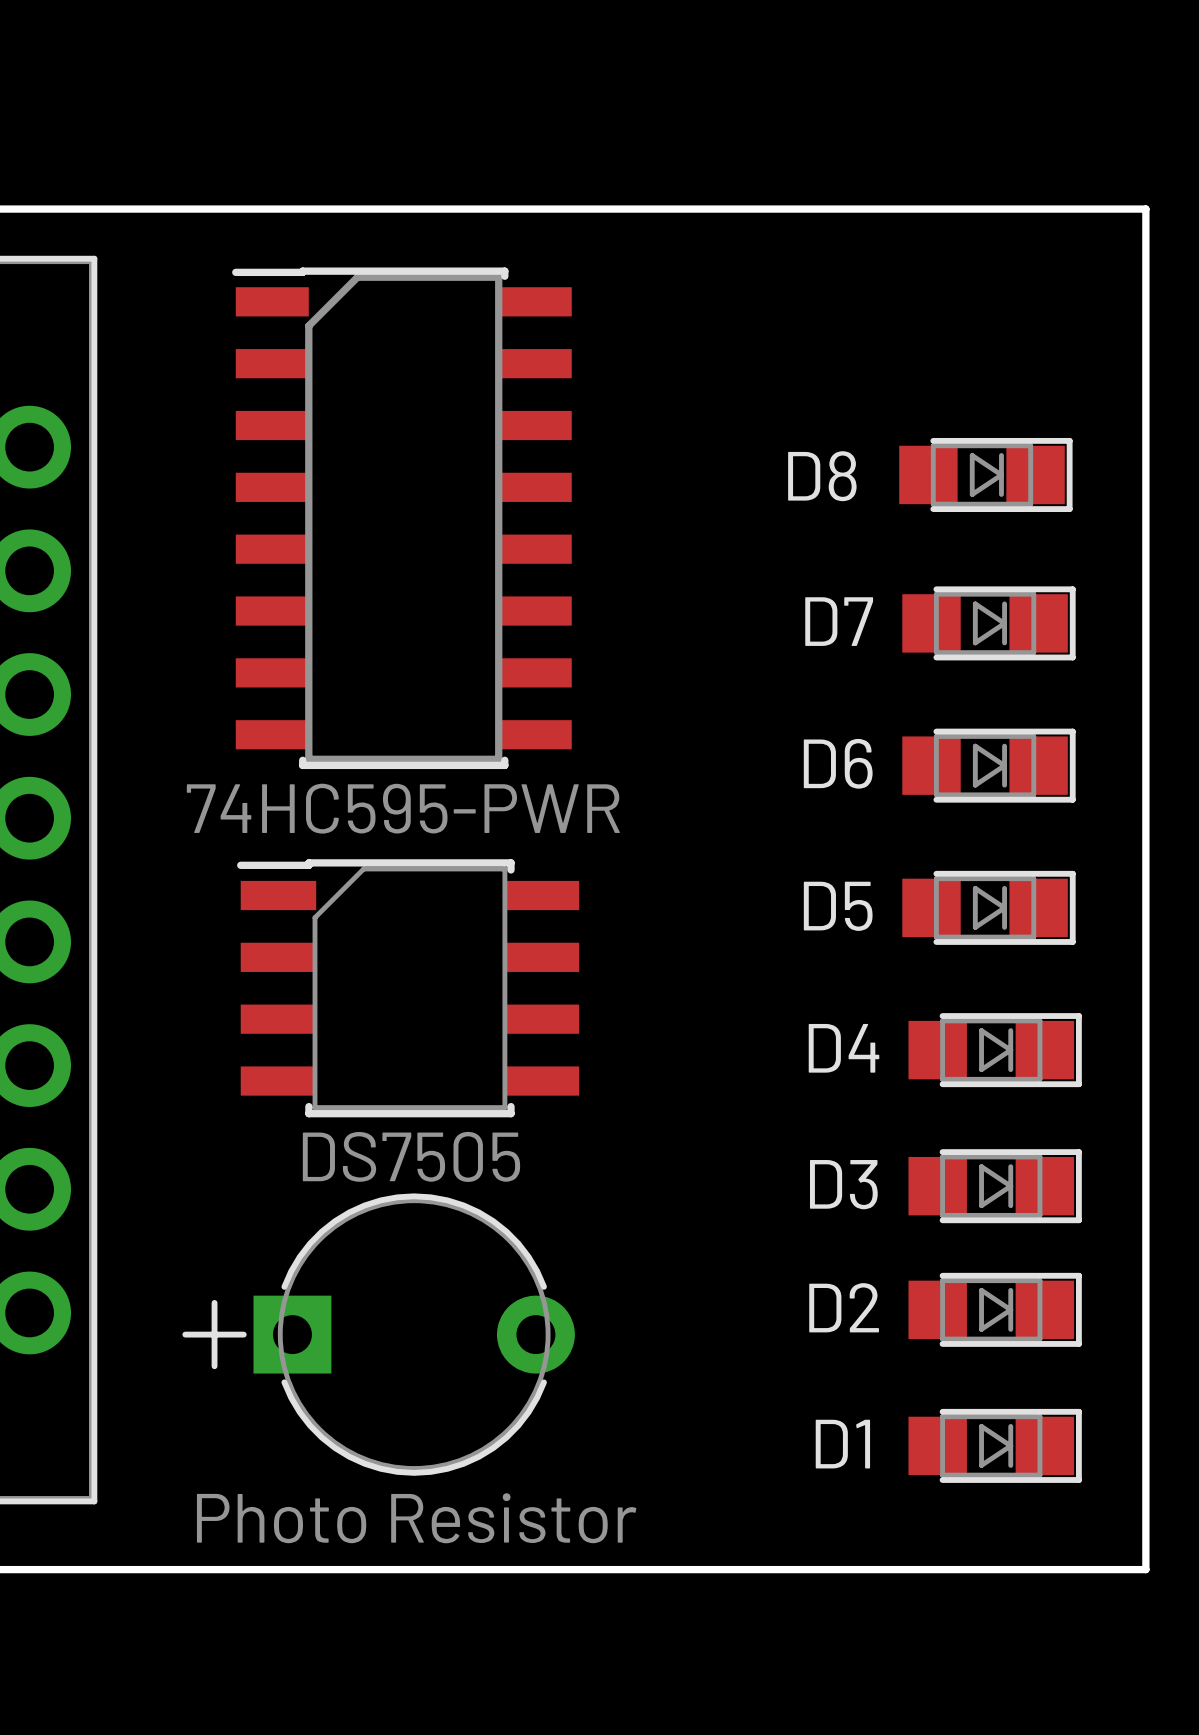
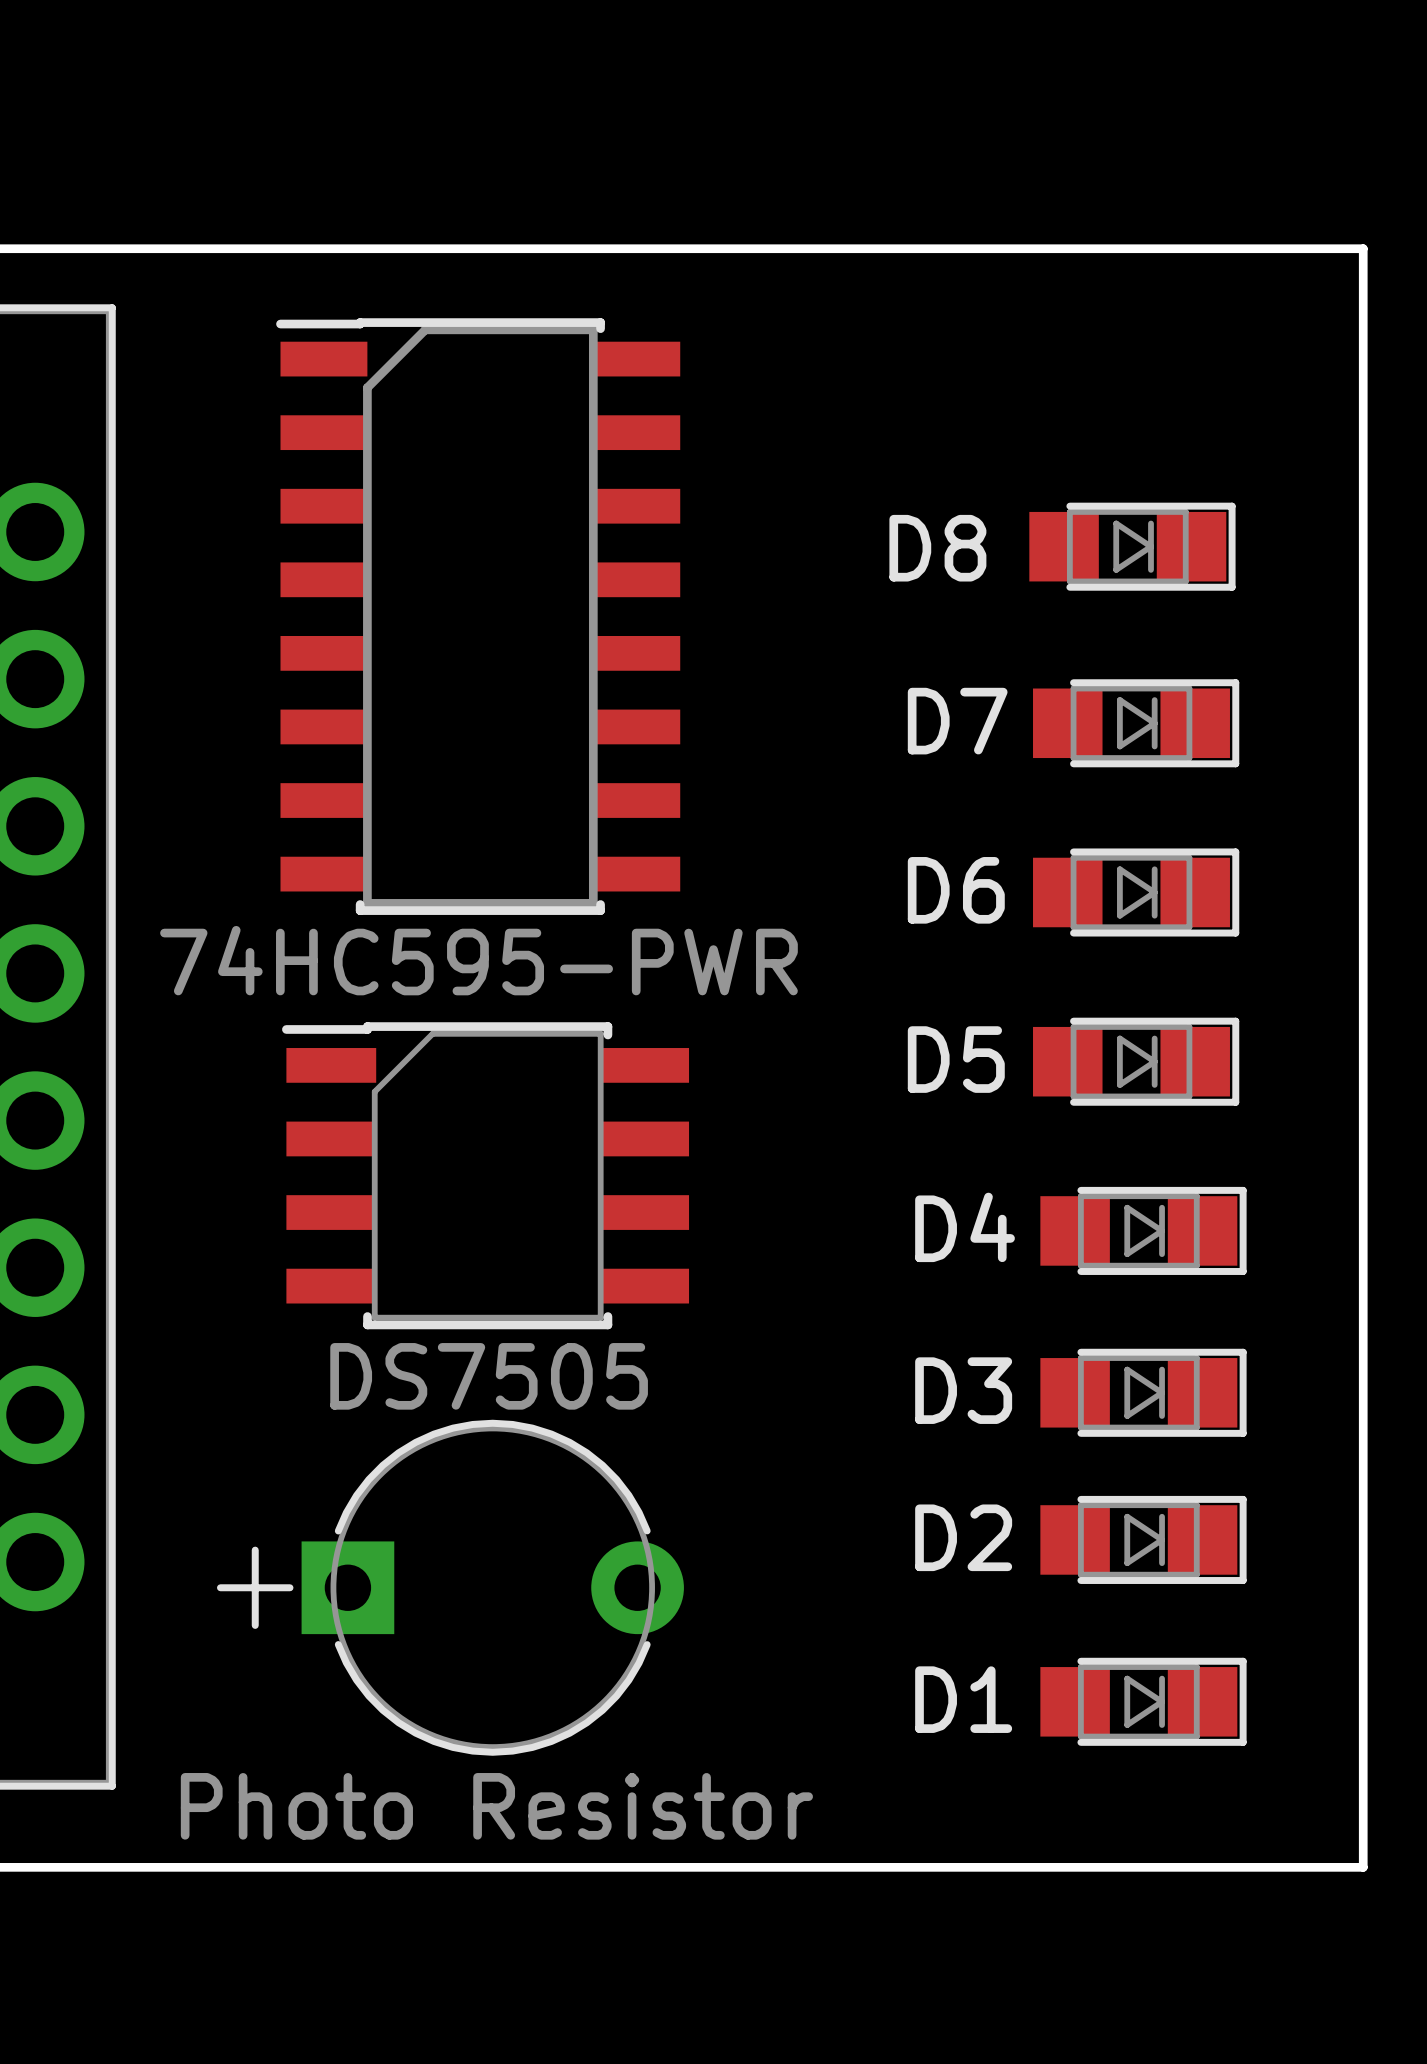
D8 position: (985, 474) -> (1132, 546)
D7 position: (988, 623) -> (1136, 723)
D6 position: (988, 765) -> (1136, 892)
D5 position: (988, 907) -> (1136, 1061)
D4 position: (995, 1050) -> (1143, 1230)
D3 position: (995, 1186) -> (1143, 1392)
D2 position: (995, 1309) -> (1143, 1539)
D1 position: (995, 1445) -> (1143, 1701)

